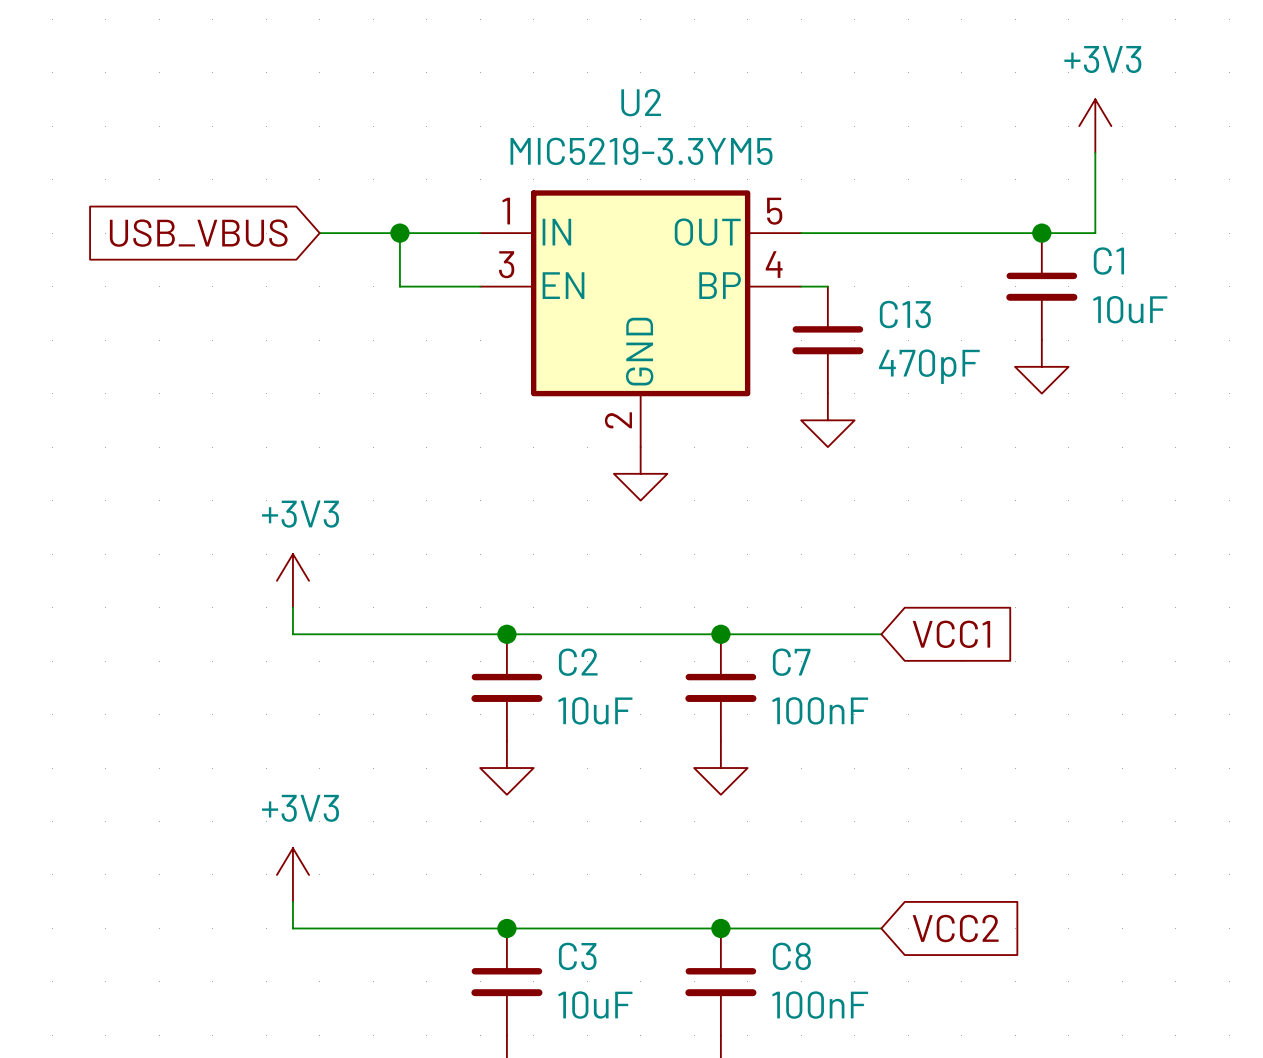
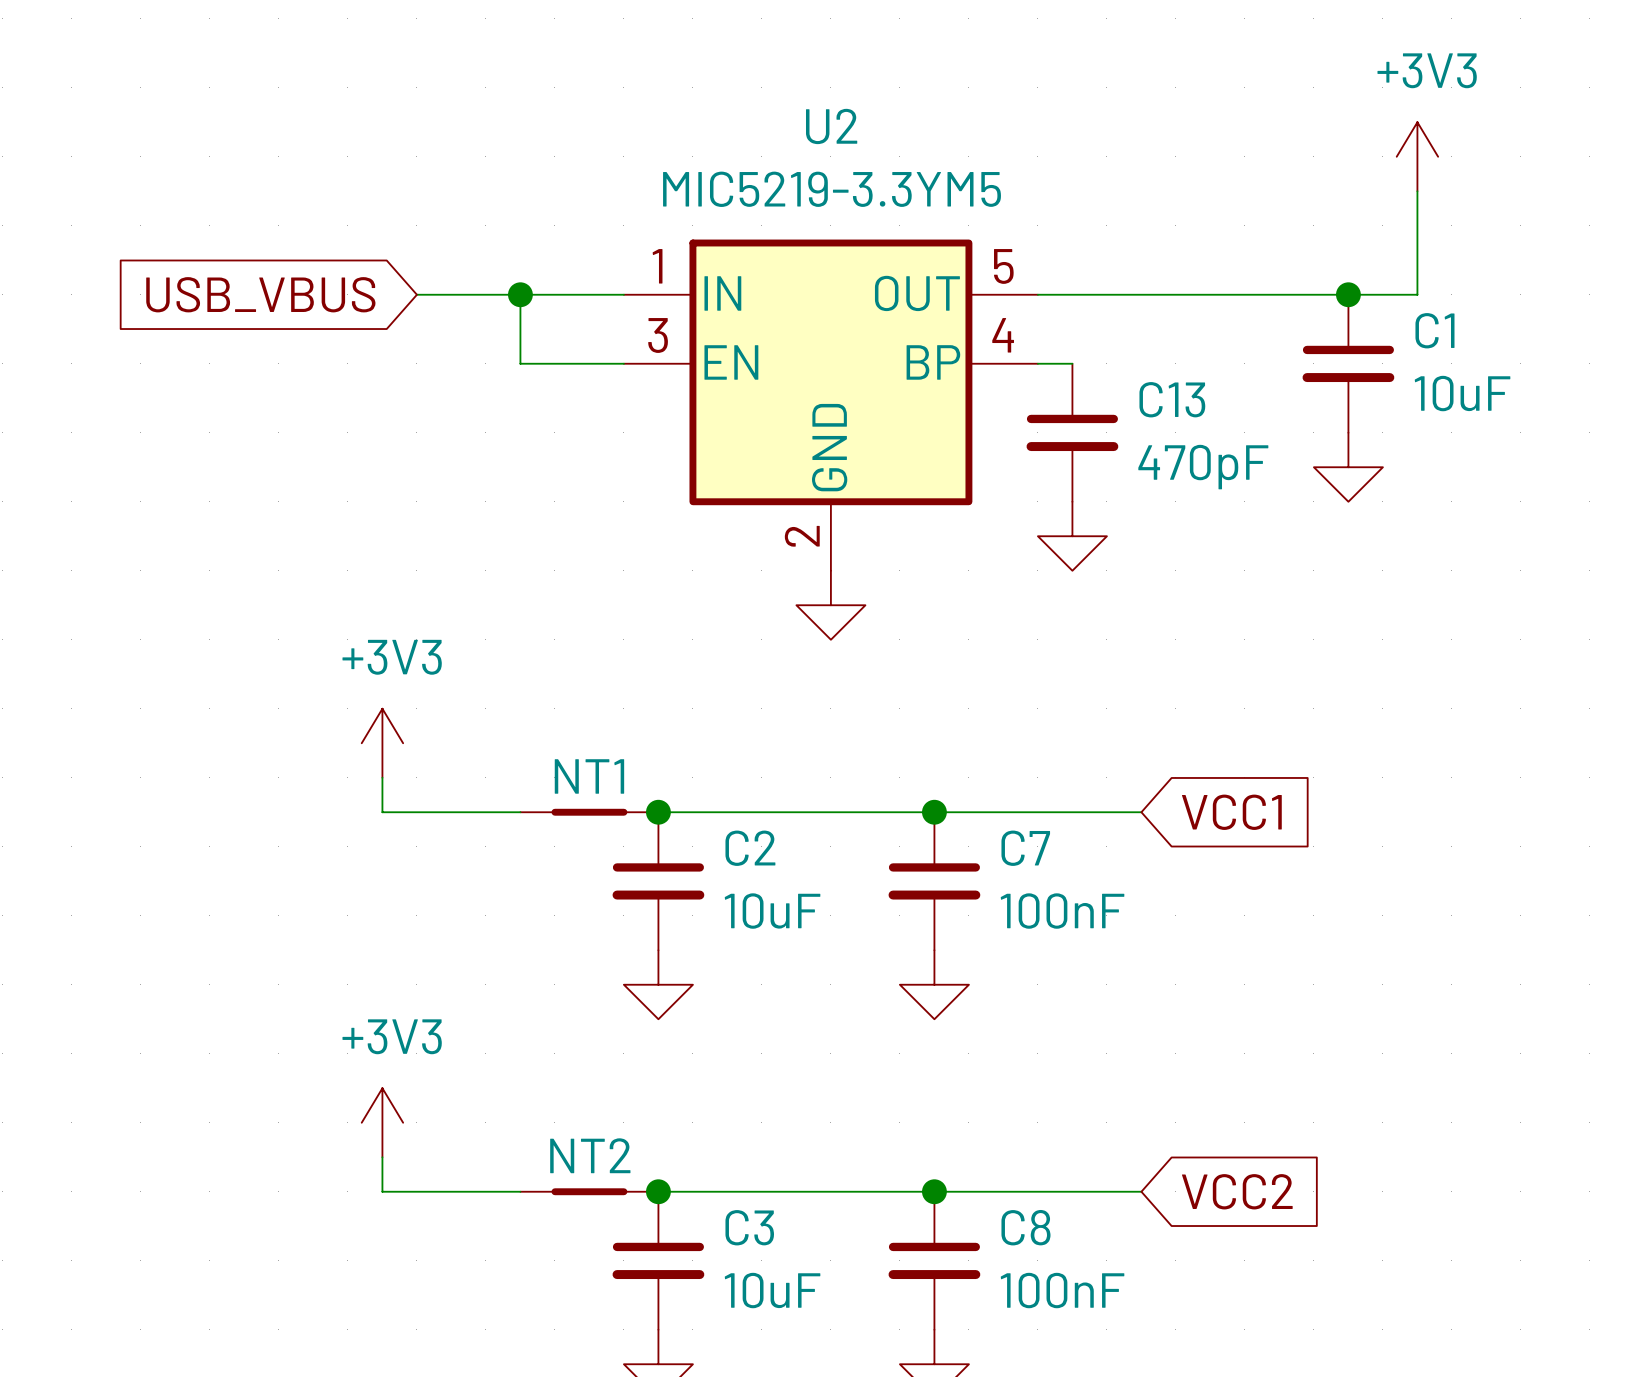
NT1: none -> (589, 812)
NT2: none -> (589, 1191)

